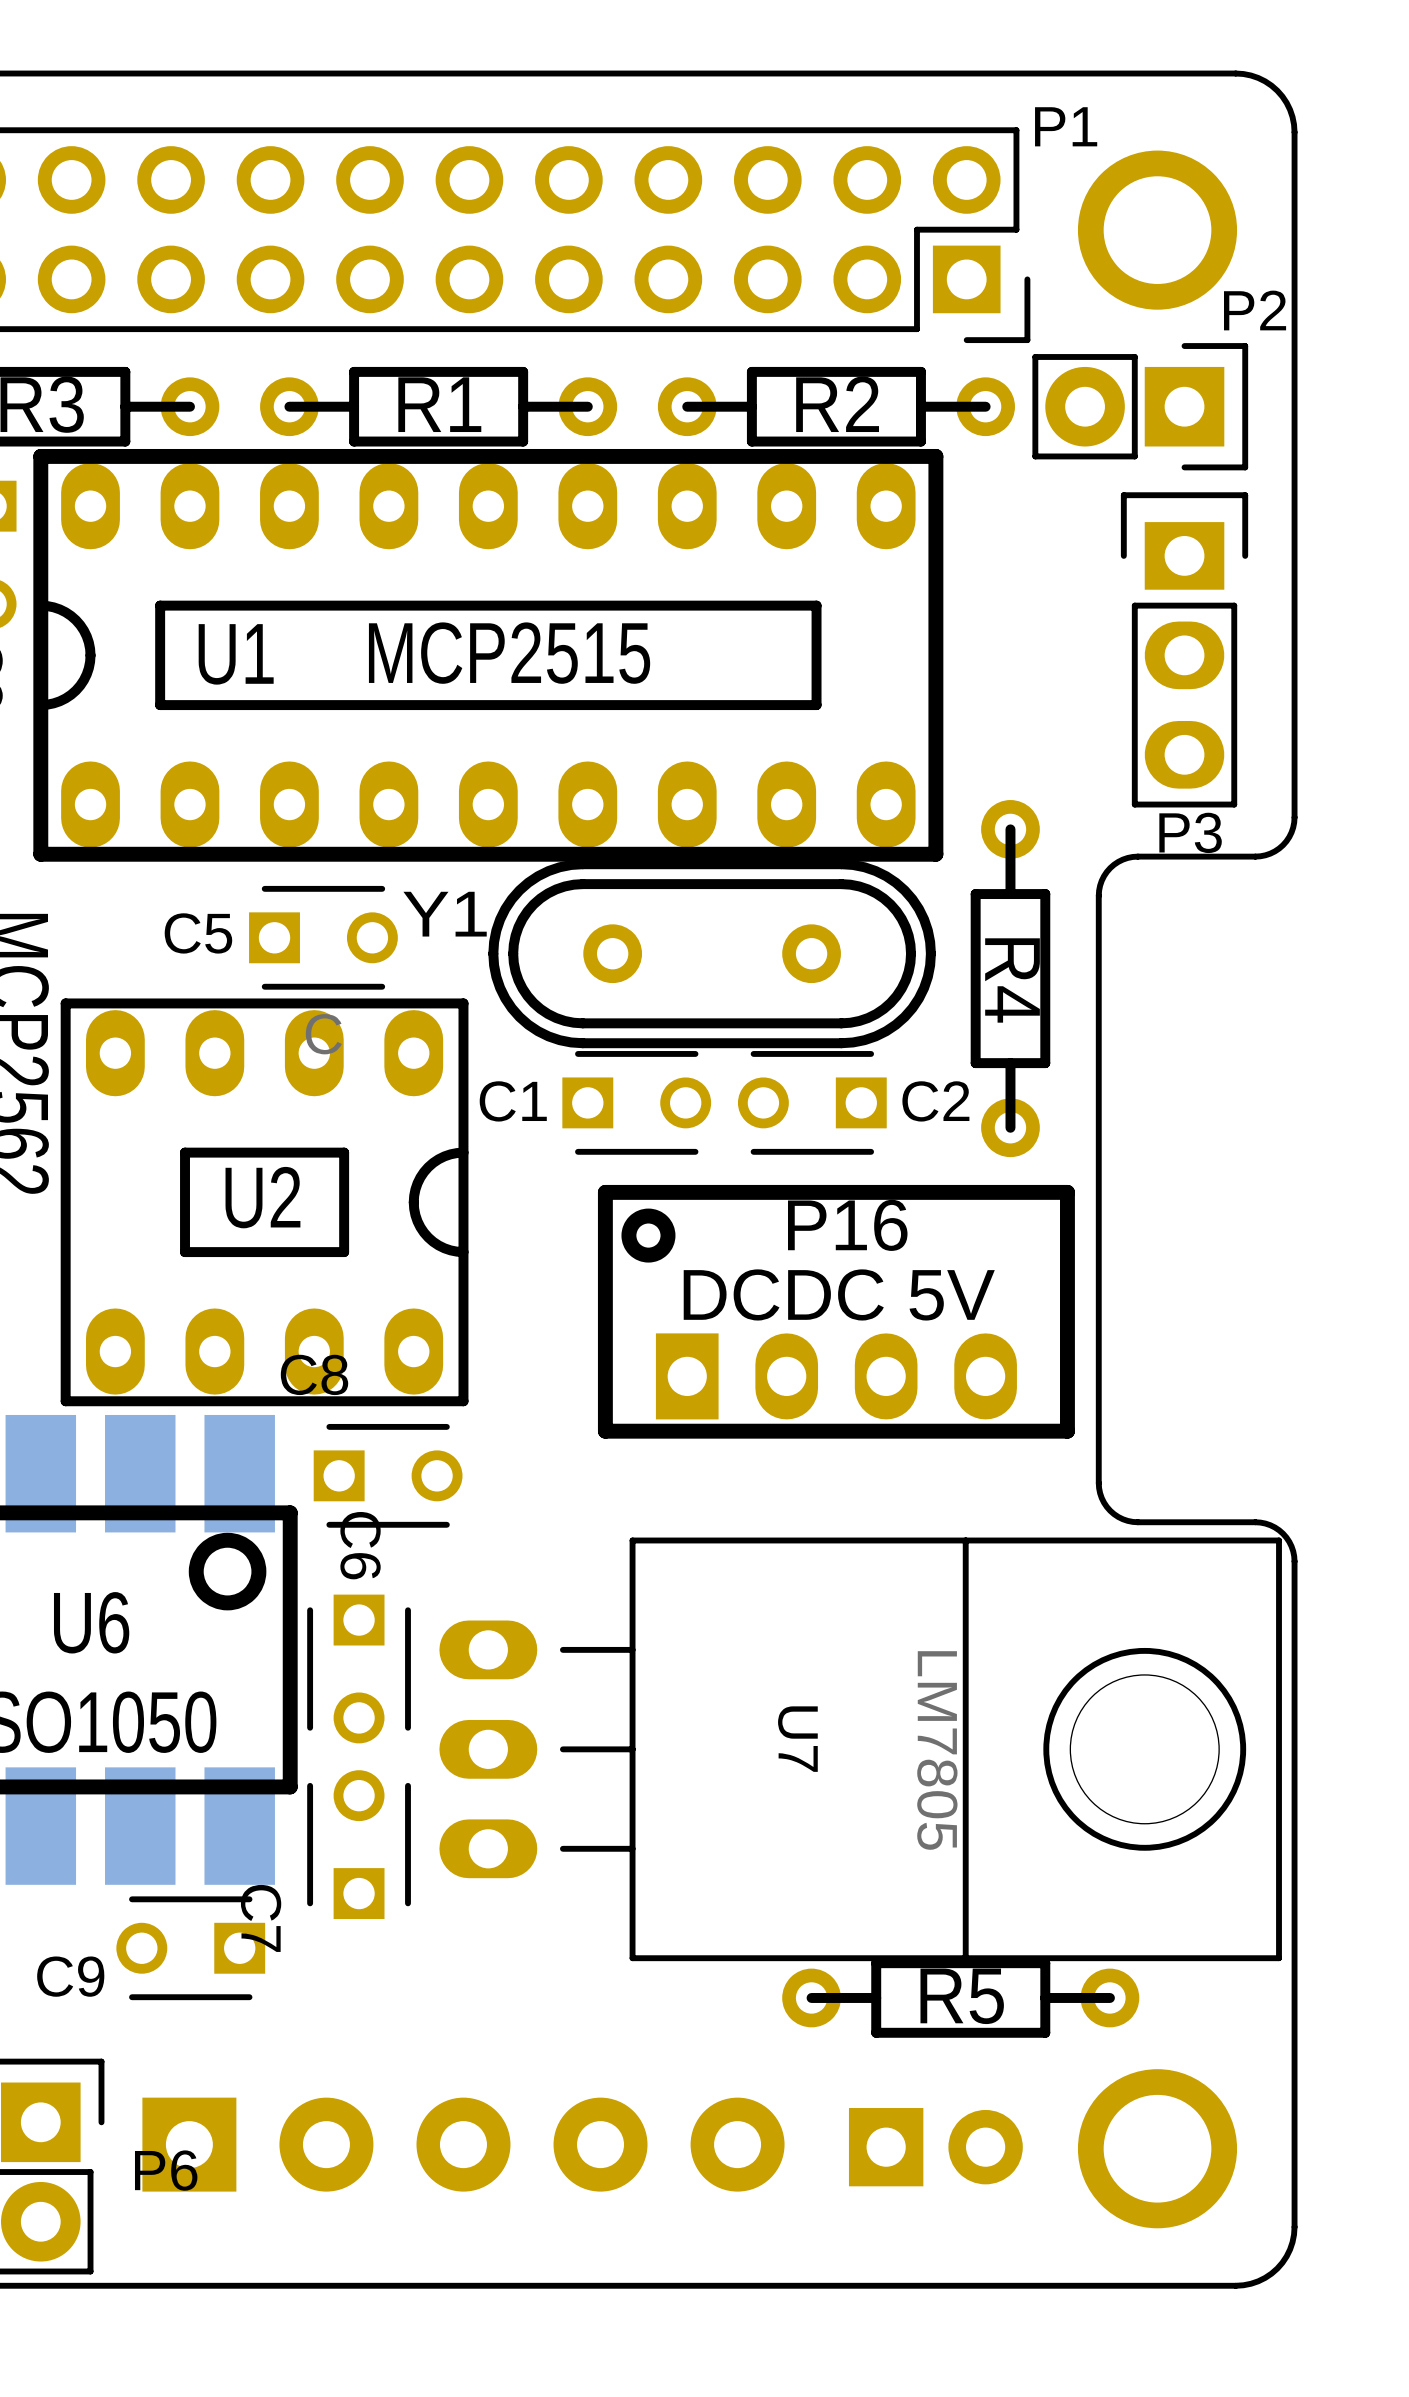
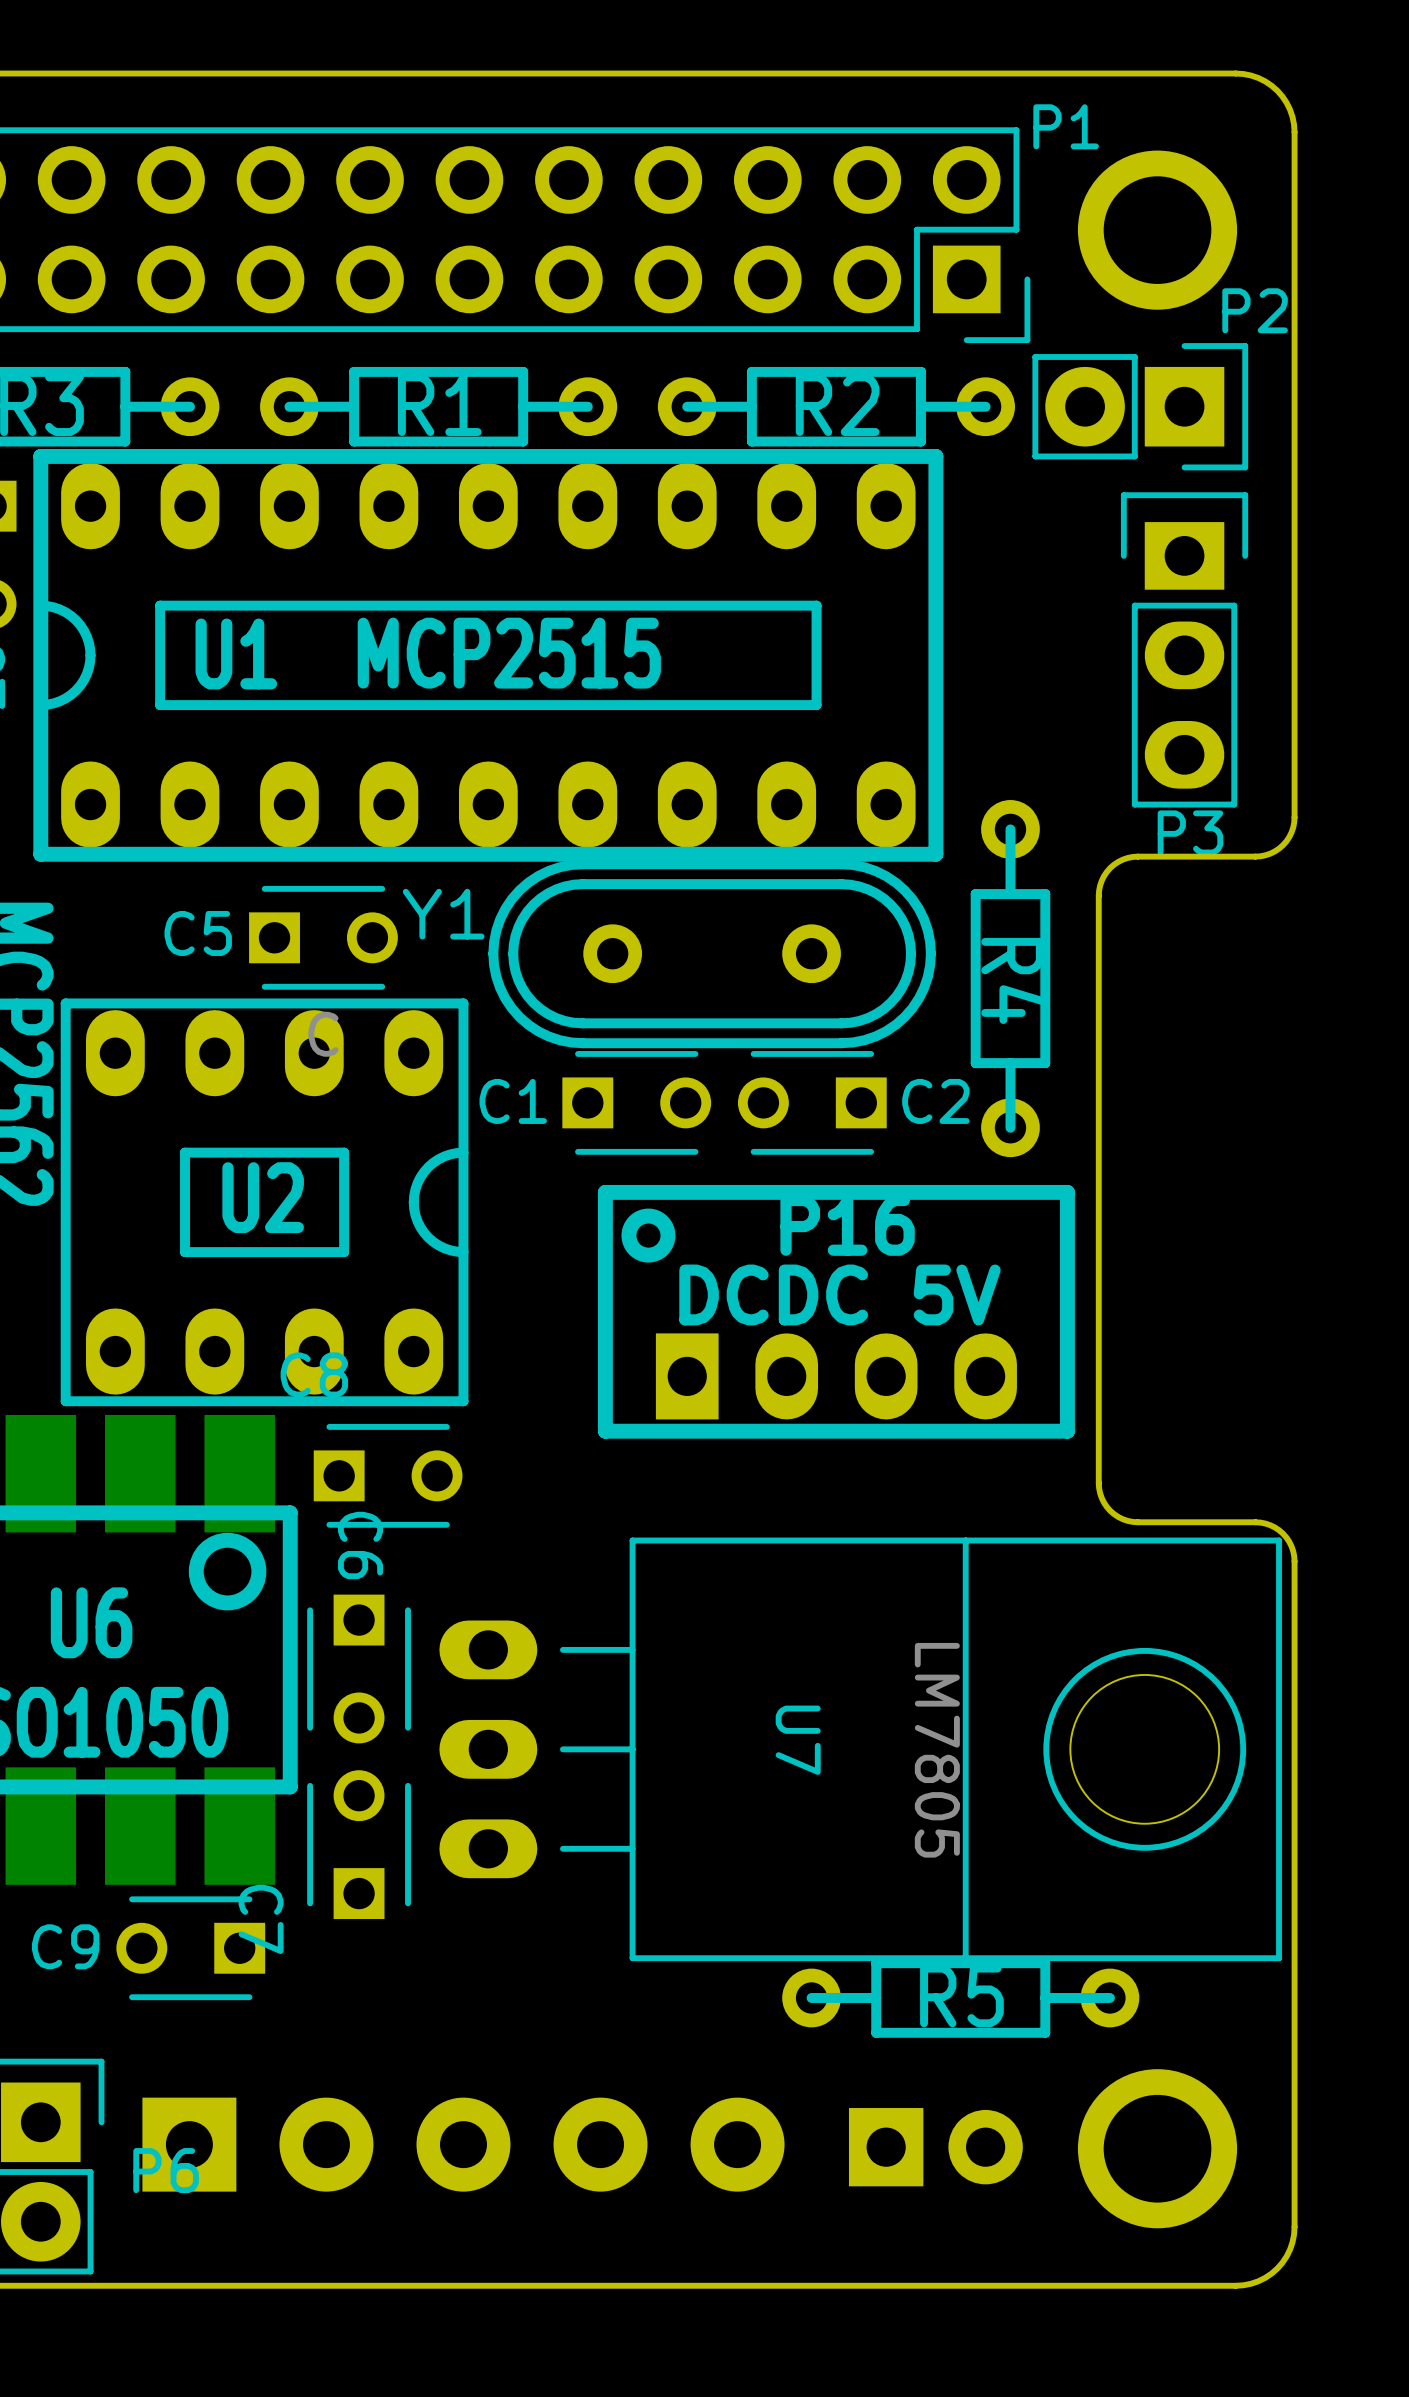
C9 name position: C9 (70, 1976) -> C9 (65, 1946)

